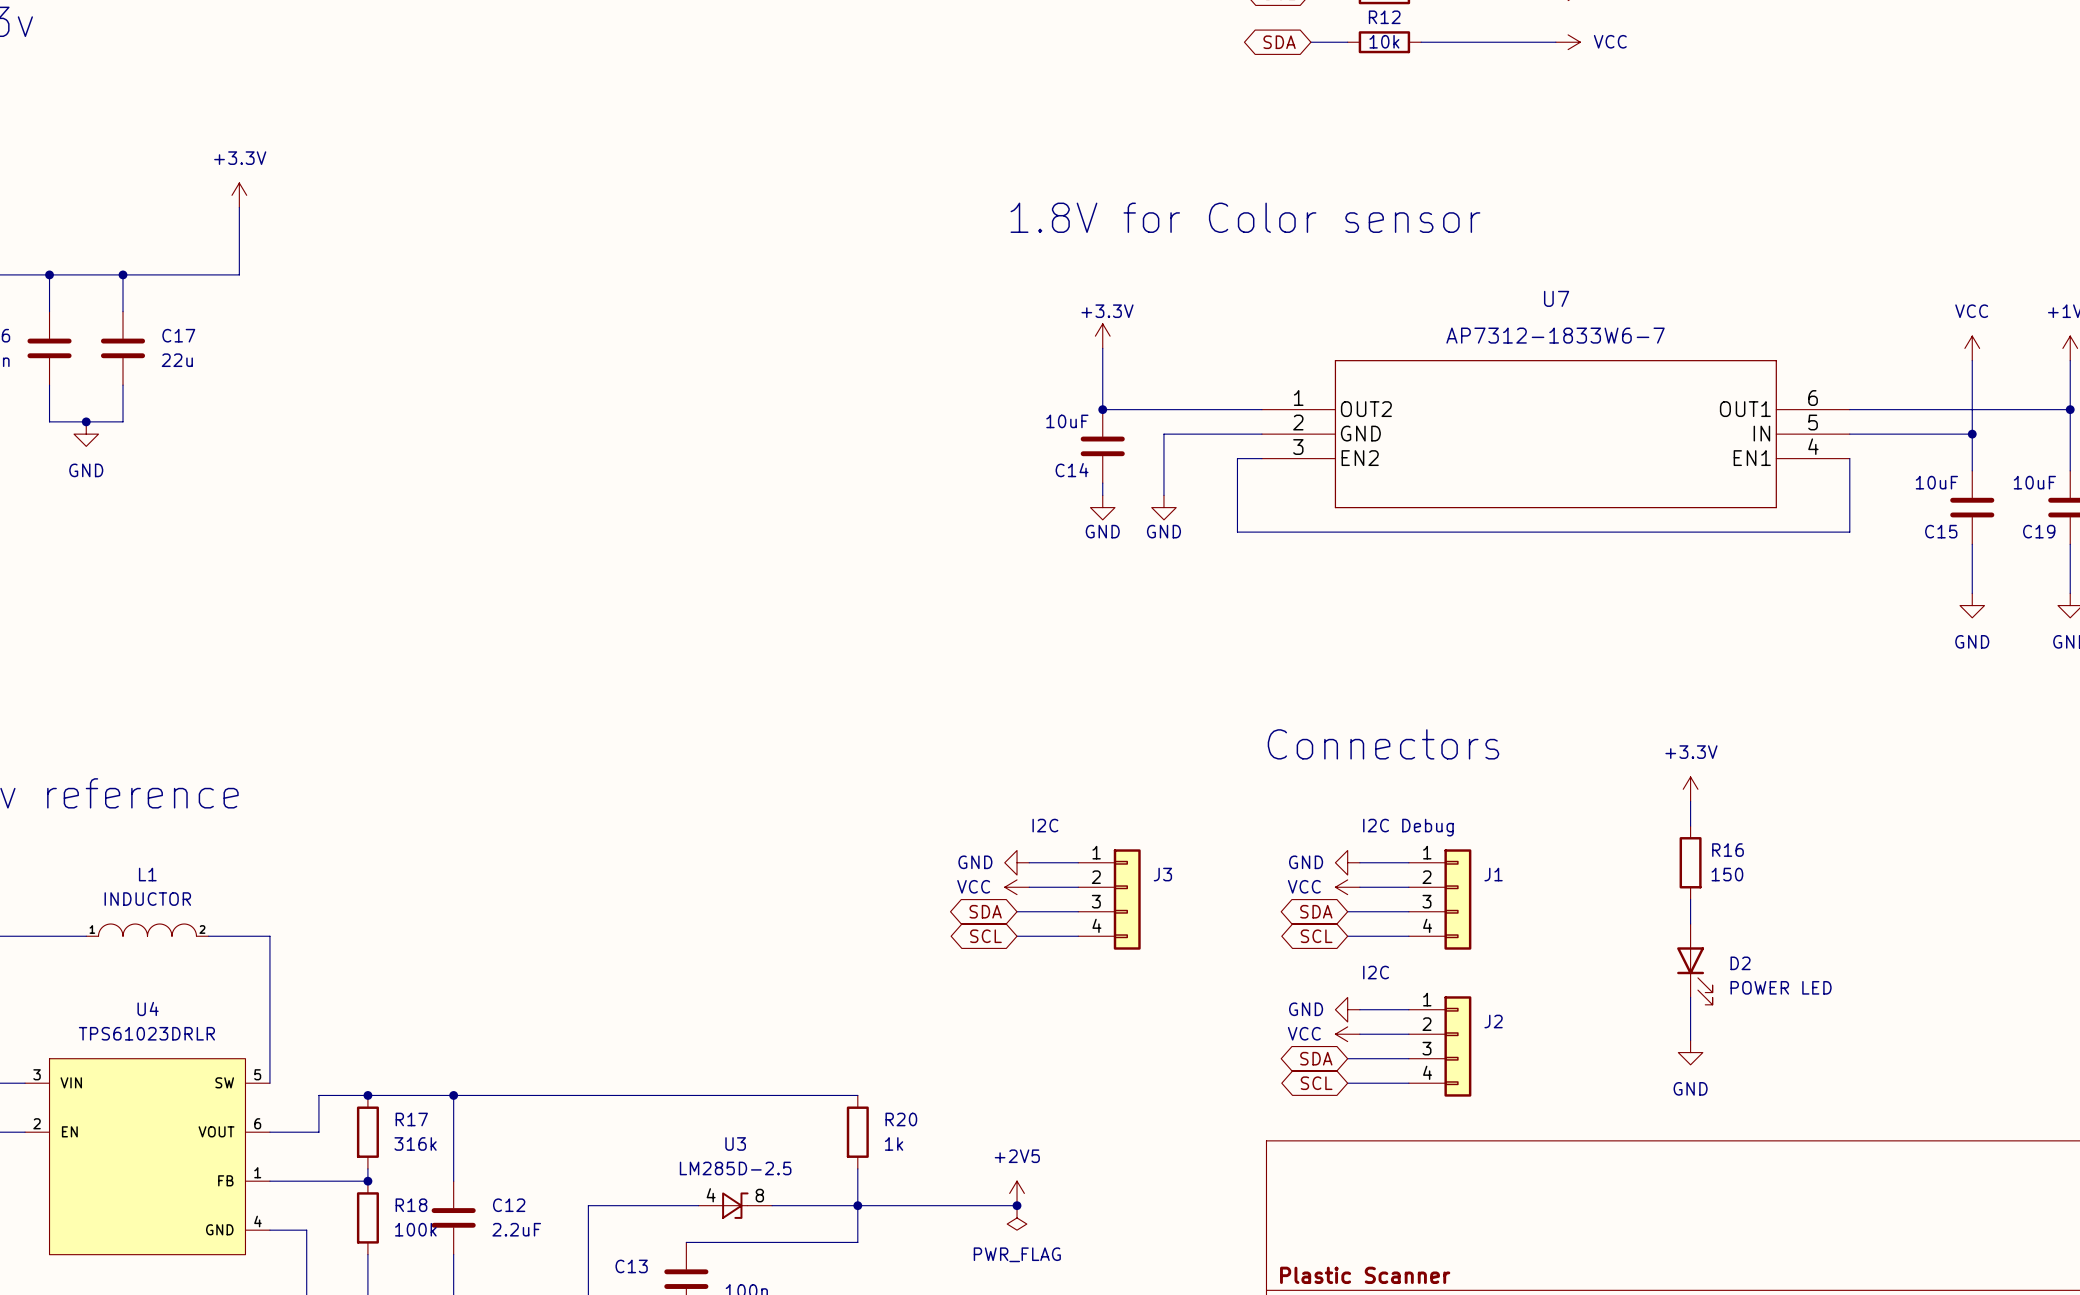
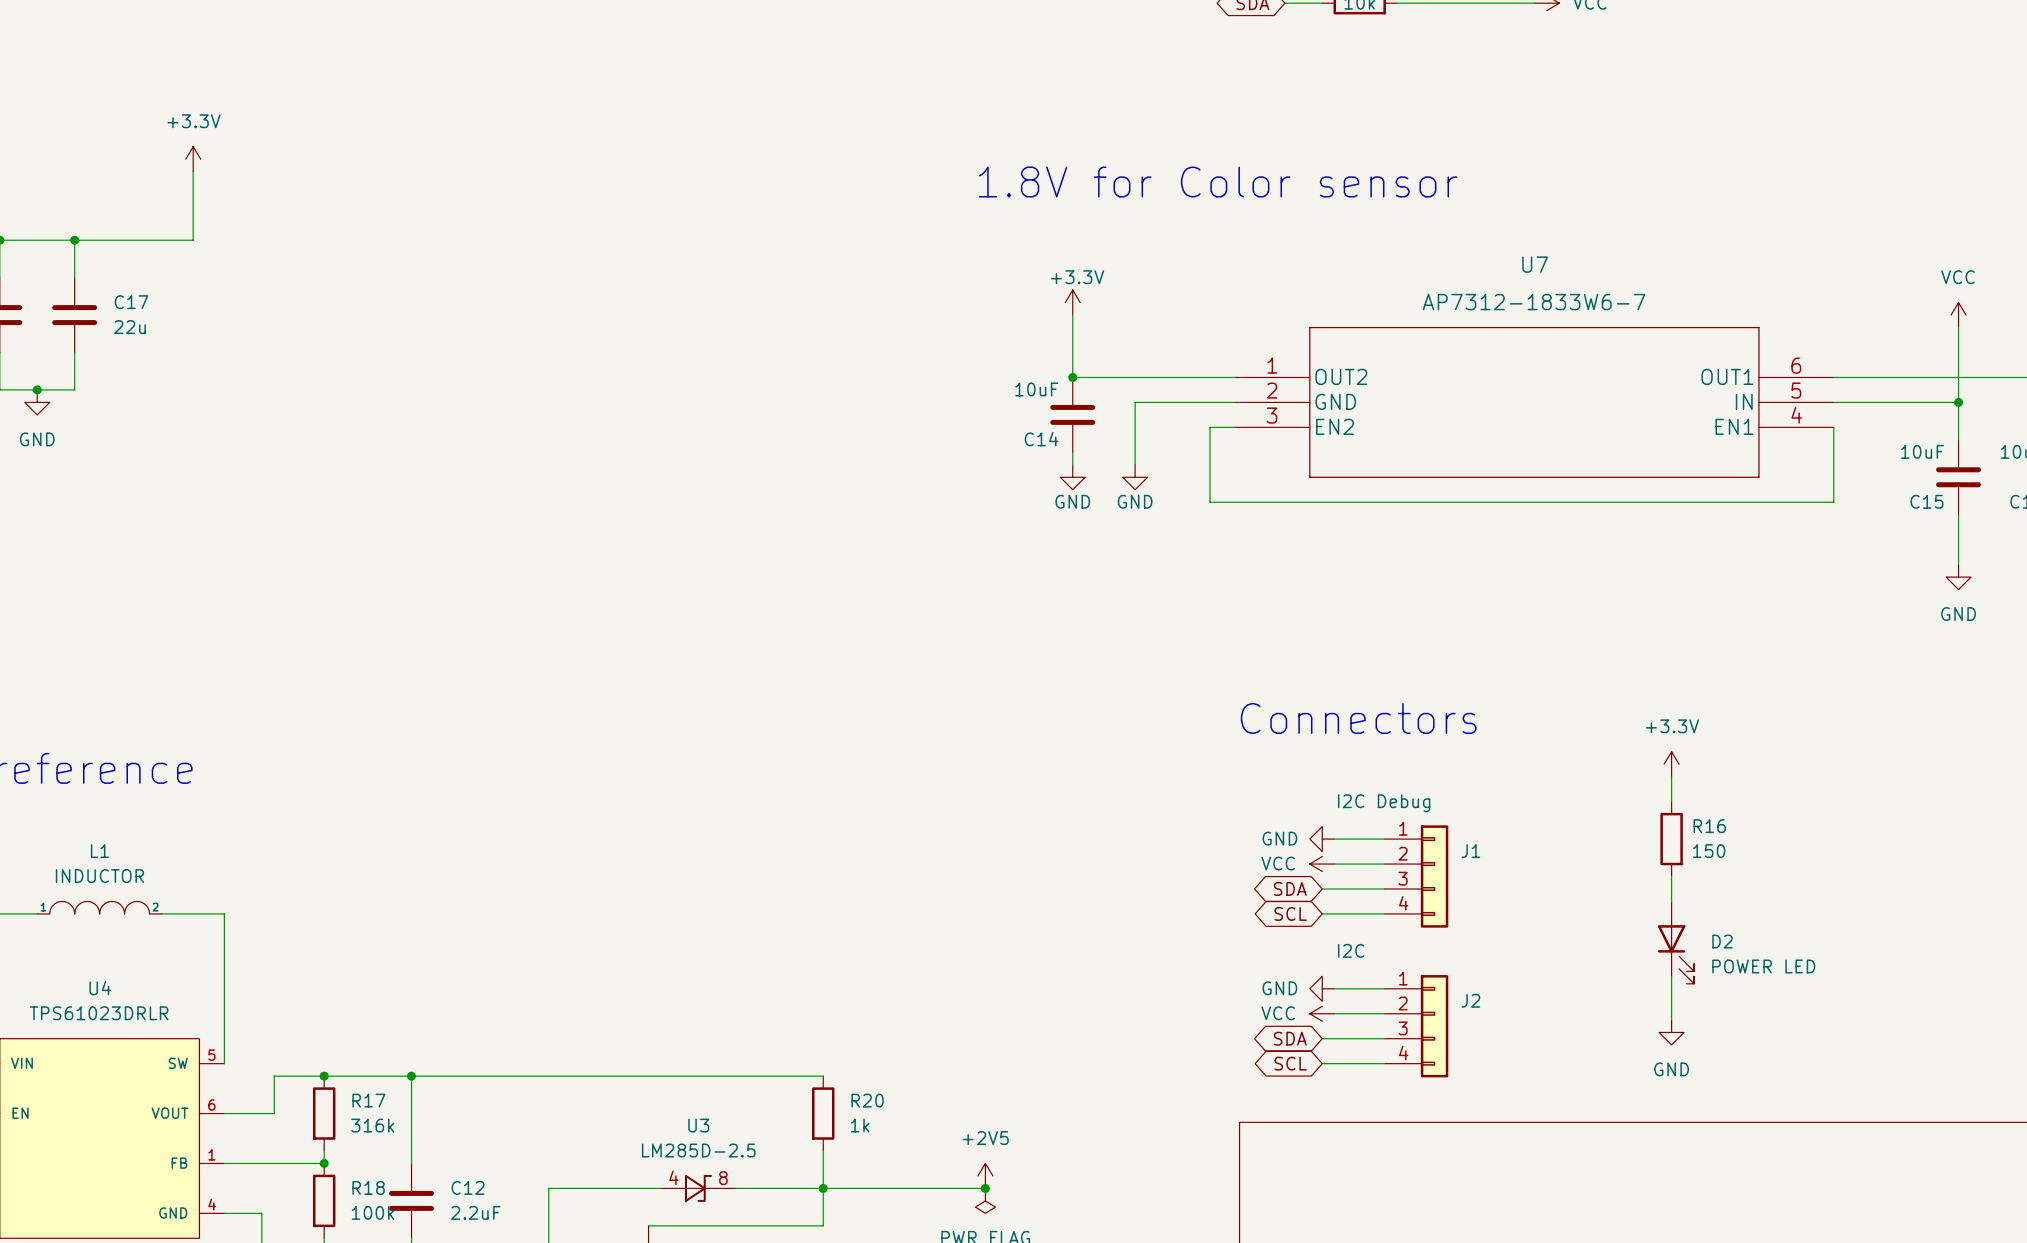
power symbol: GND (1017, 862) -> none
wire: (1029, 862) (1078, 862) -> none
power symbol: VCC (1017, 887) -> none
wire: (1029, 887) (1078, 887) -> none
J3: I2C (1109, 899) -> none
global label: SDA (985, 911) -> none
wire: (1017, 911) (1078, 911) -> none
global label: SCL (985, 936) -> none
wire: (1017, 936) (1078, 936) -> none

